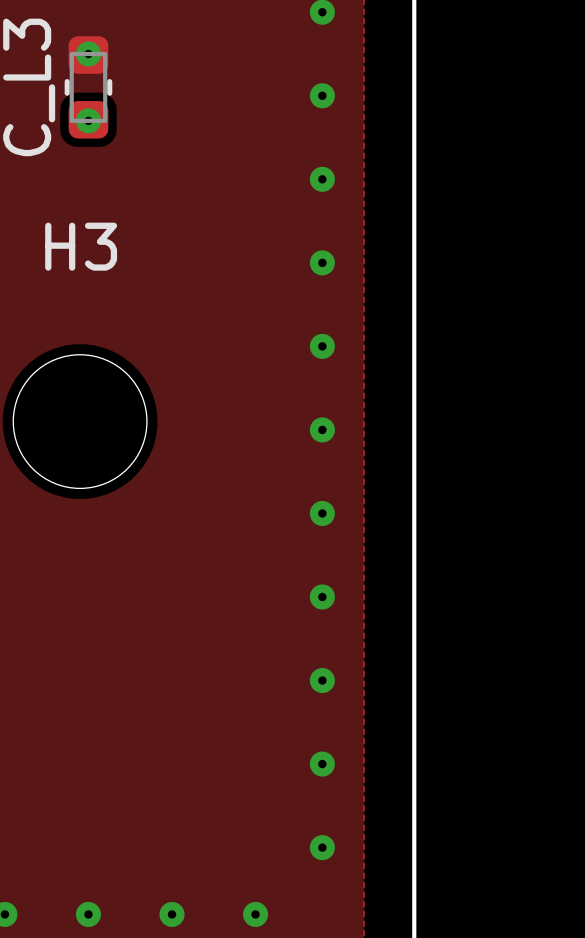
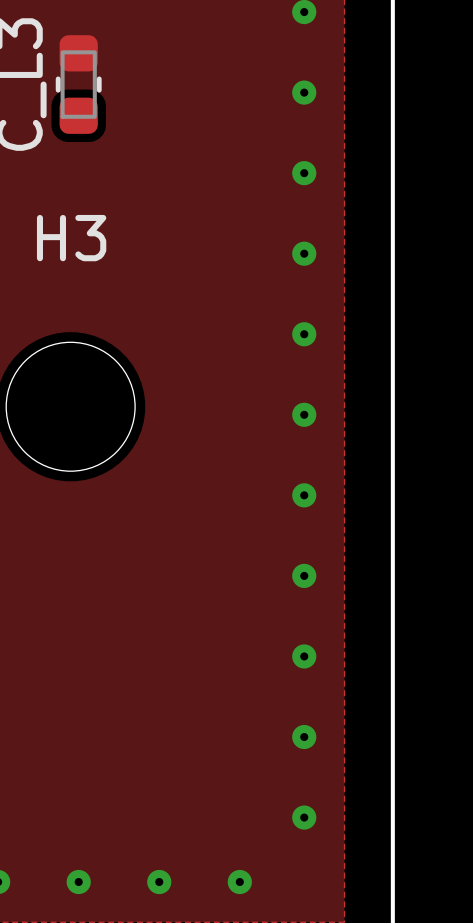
via: (88, 54) -> none
via: (88, 120) -> none

